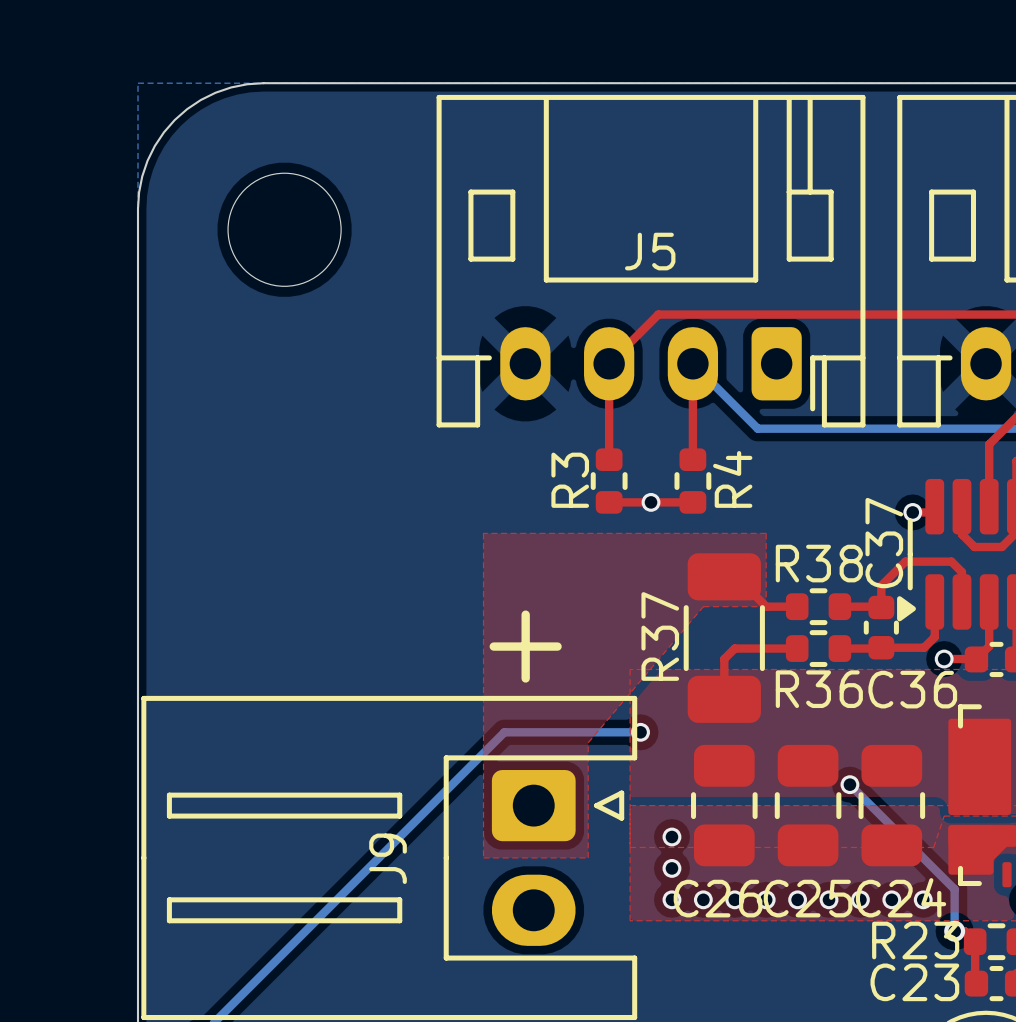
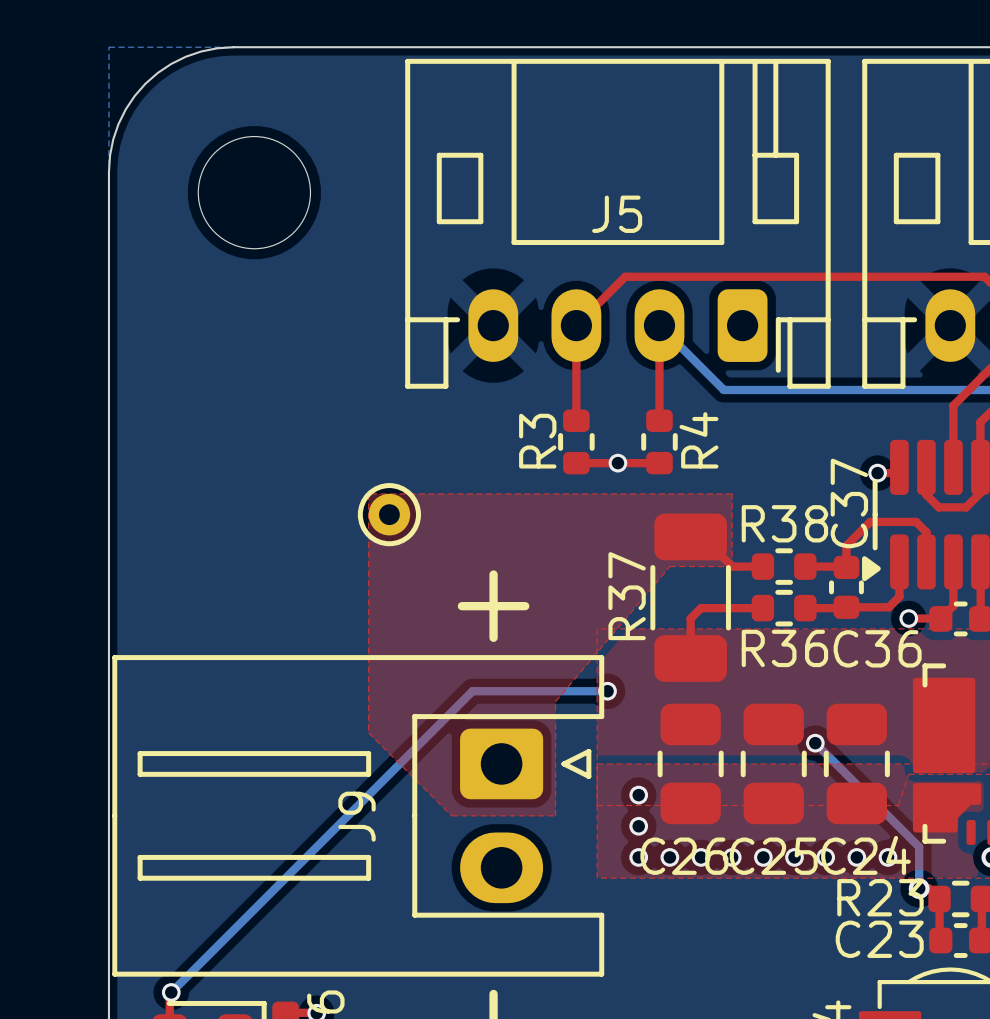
top zone outline: (483, 533) (483, 857) -> (451, 493) (368, 493) (368, 732) (451, 815)
part: none -> (389, 514)

